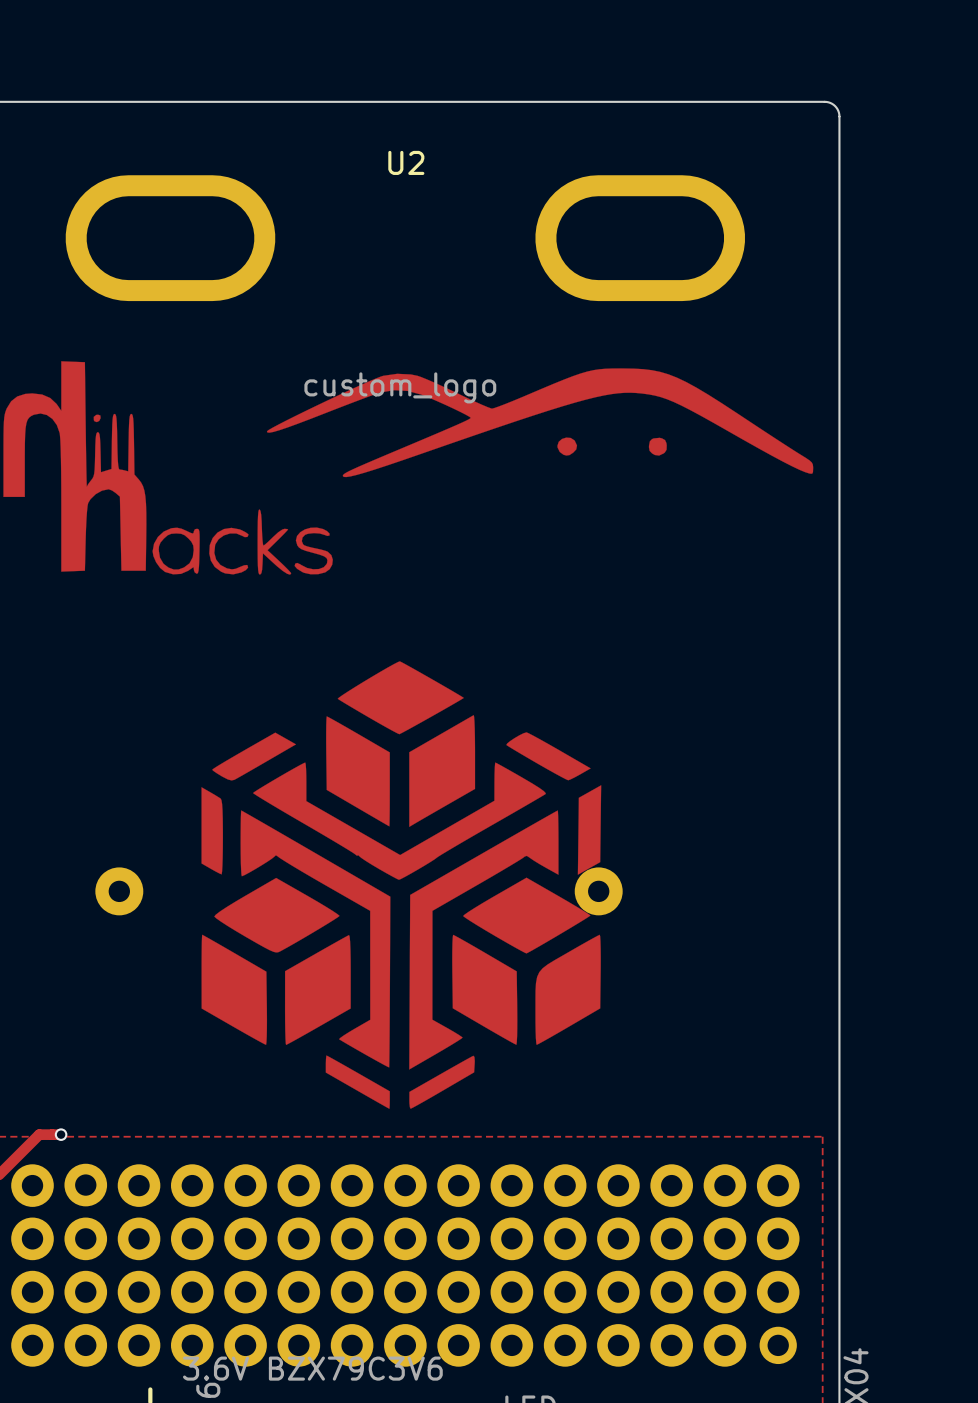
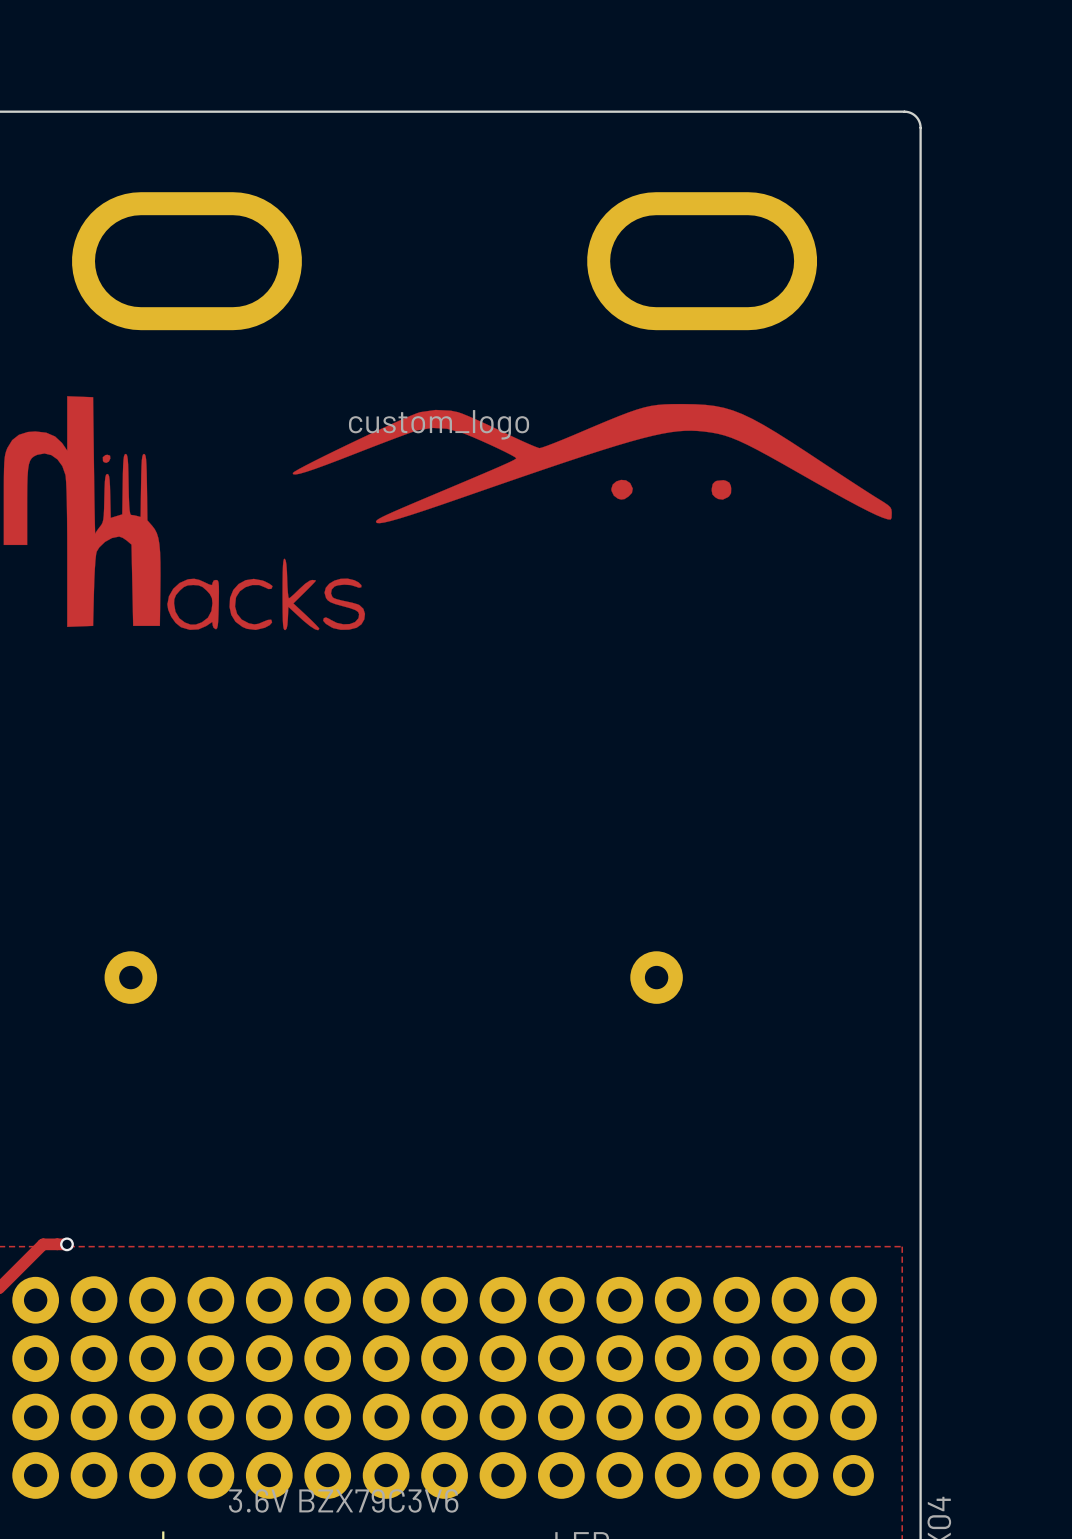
U2: custom_logo (400, 277) -> none
drawing: [201, 661, 602, 1109] -> none

